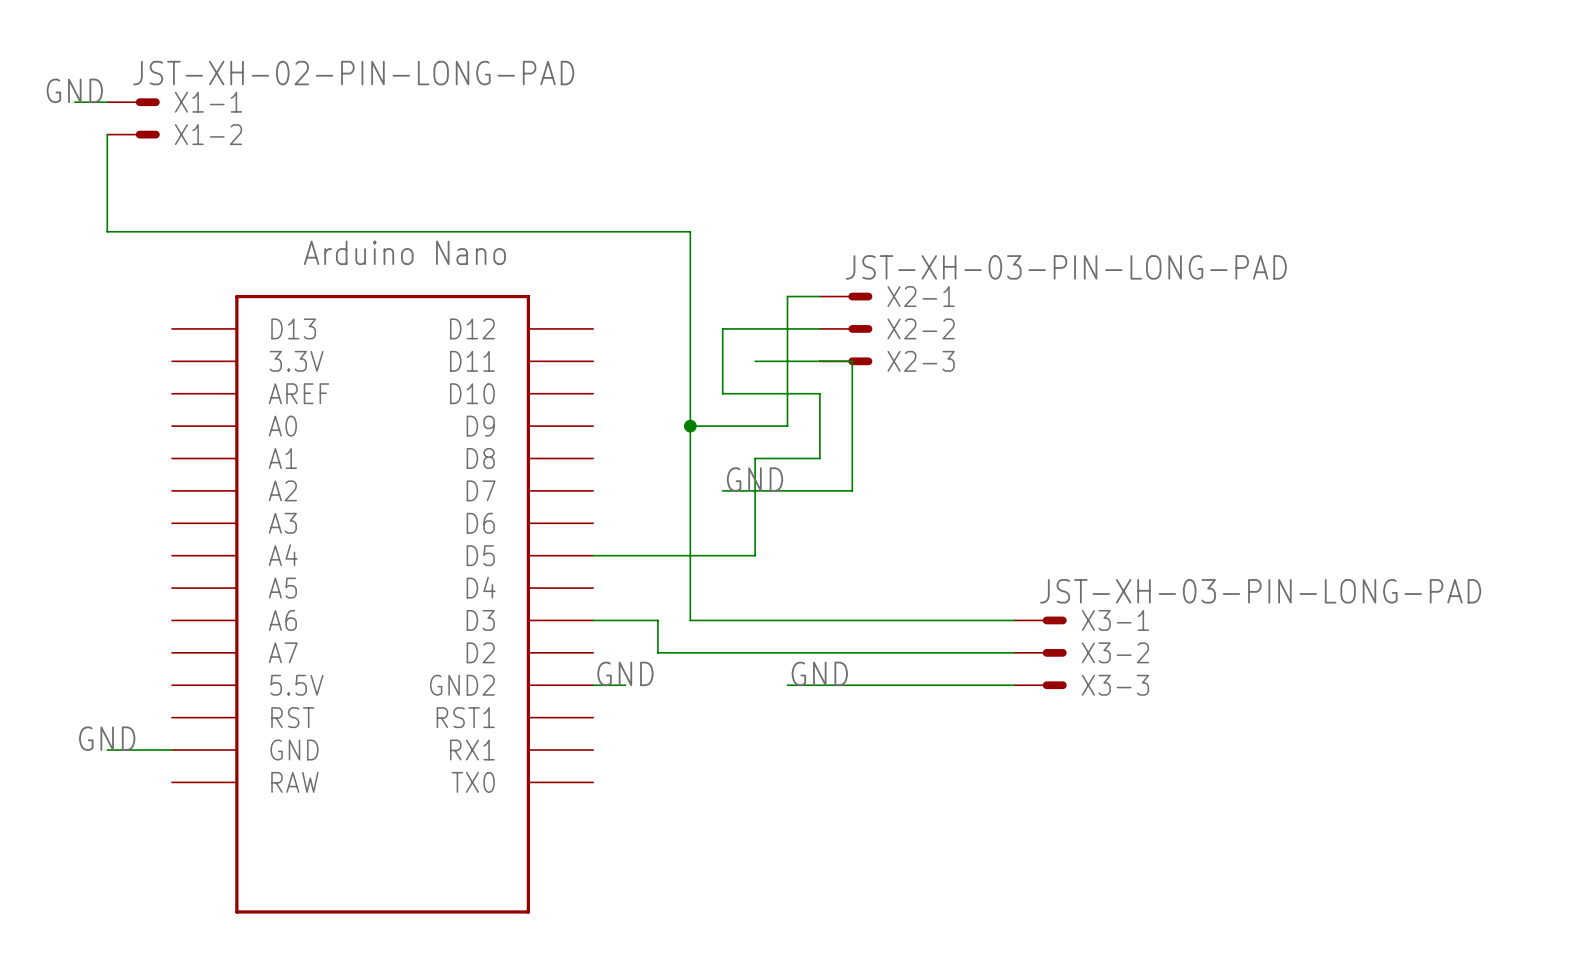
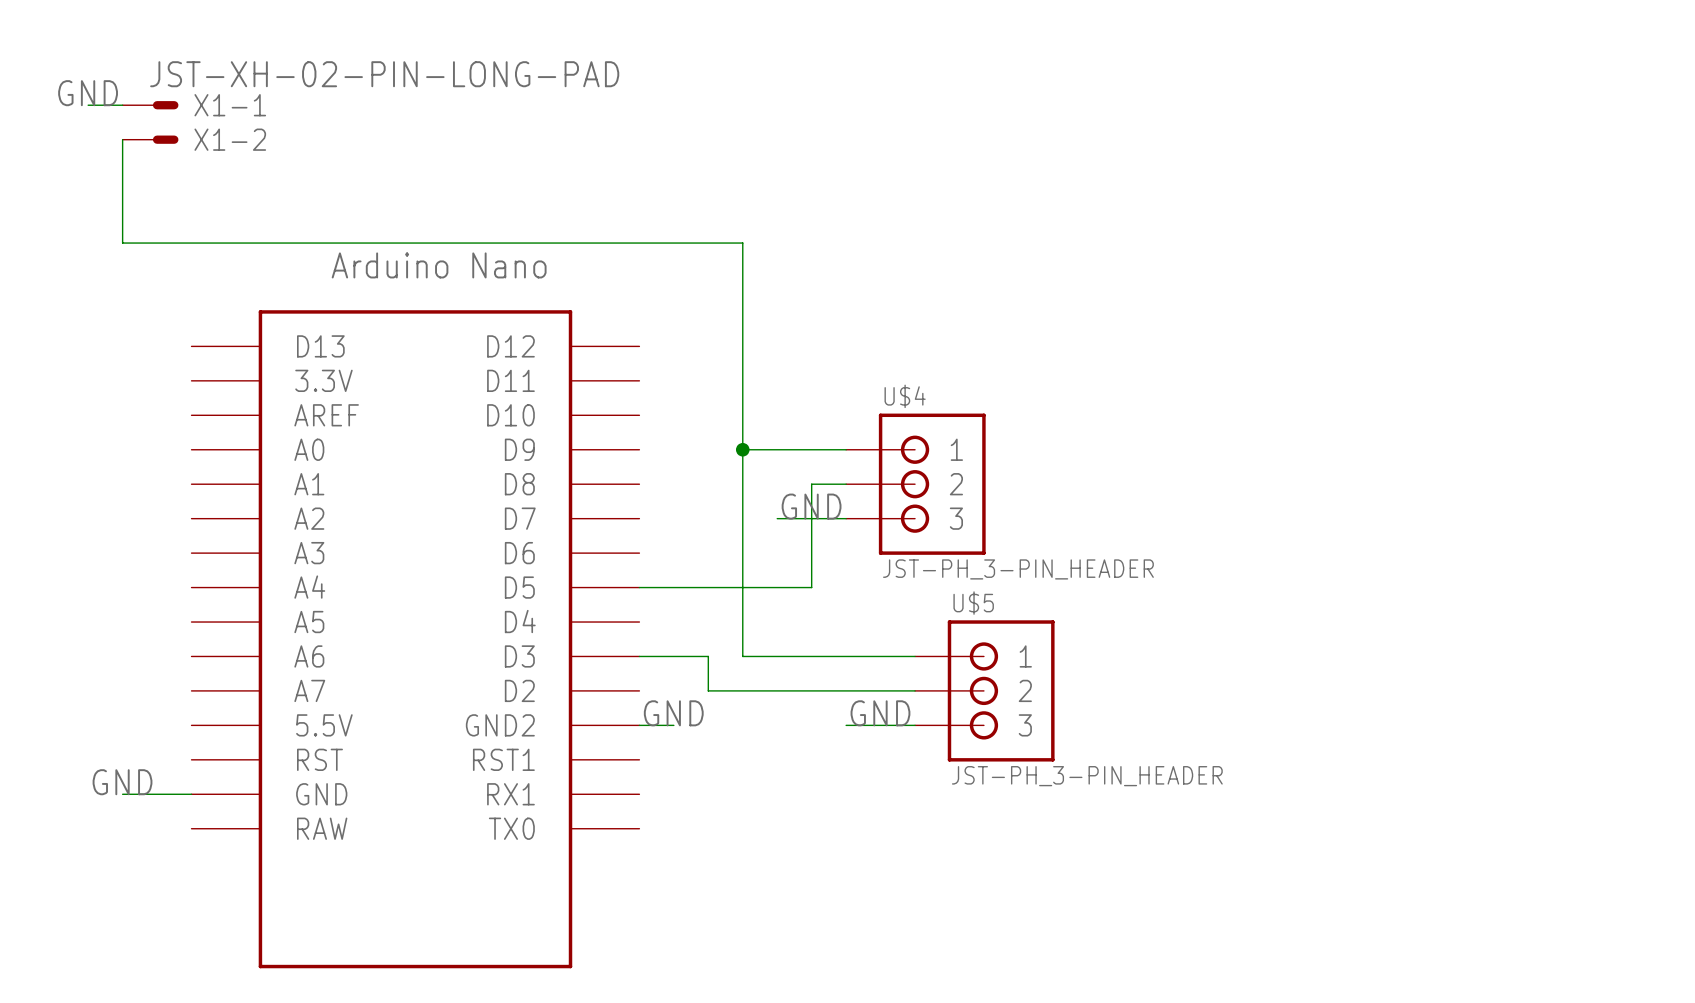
wire: (819, 296) (787, 296) (787, 426) -> none
X2-1: JST-XH-03-PIN-LONG-PAD (846, 296) -> none
wire: (819, 328) (722, 328) (722, 393) (819, 393) (819, 458) (787, 458) -> none
X2-2: (846, 328) -> none
wire: (755, 361) (852, 361) (852, 490) (787, 490) -> none
X2-3: (846, 361) -> none
U$4: none -> JST-PH_3-PIN_HEADER (915, 484)
wire: (852, 620) (1014, 620) -> none
X3-1: JST-XH-03-PIN-LONG-PAD (1040, 620) -> none
wire: (852, 652) (1014, 652) -> none
U$5: none -> JST-PH_3-PIN_HEADER (984, 690)
X3-2: (1040, 652) -> none
wire: (852, 685) (1014, 685) -> none
X3-3: (1040, 685) -> none

